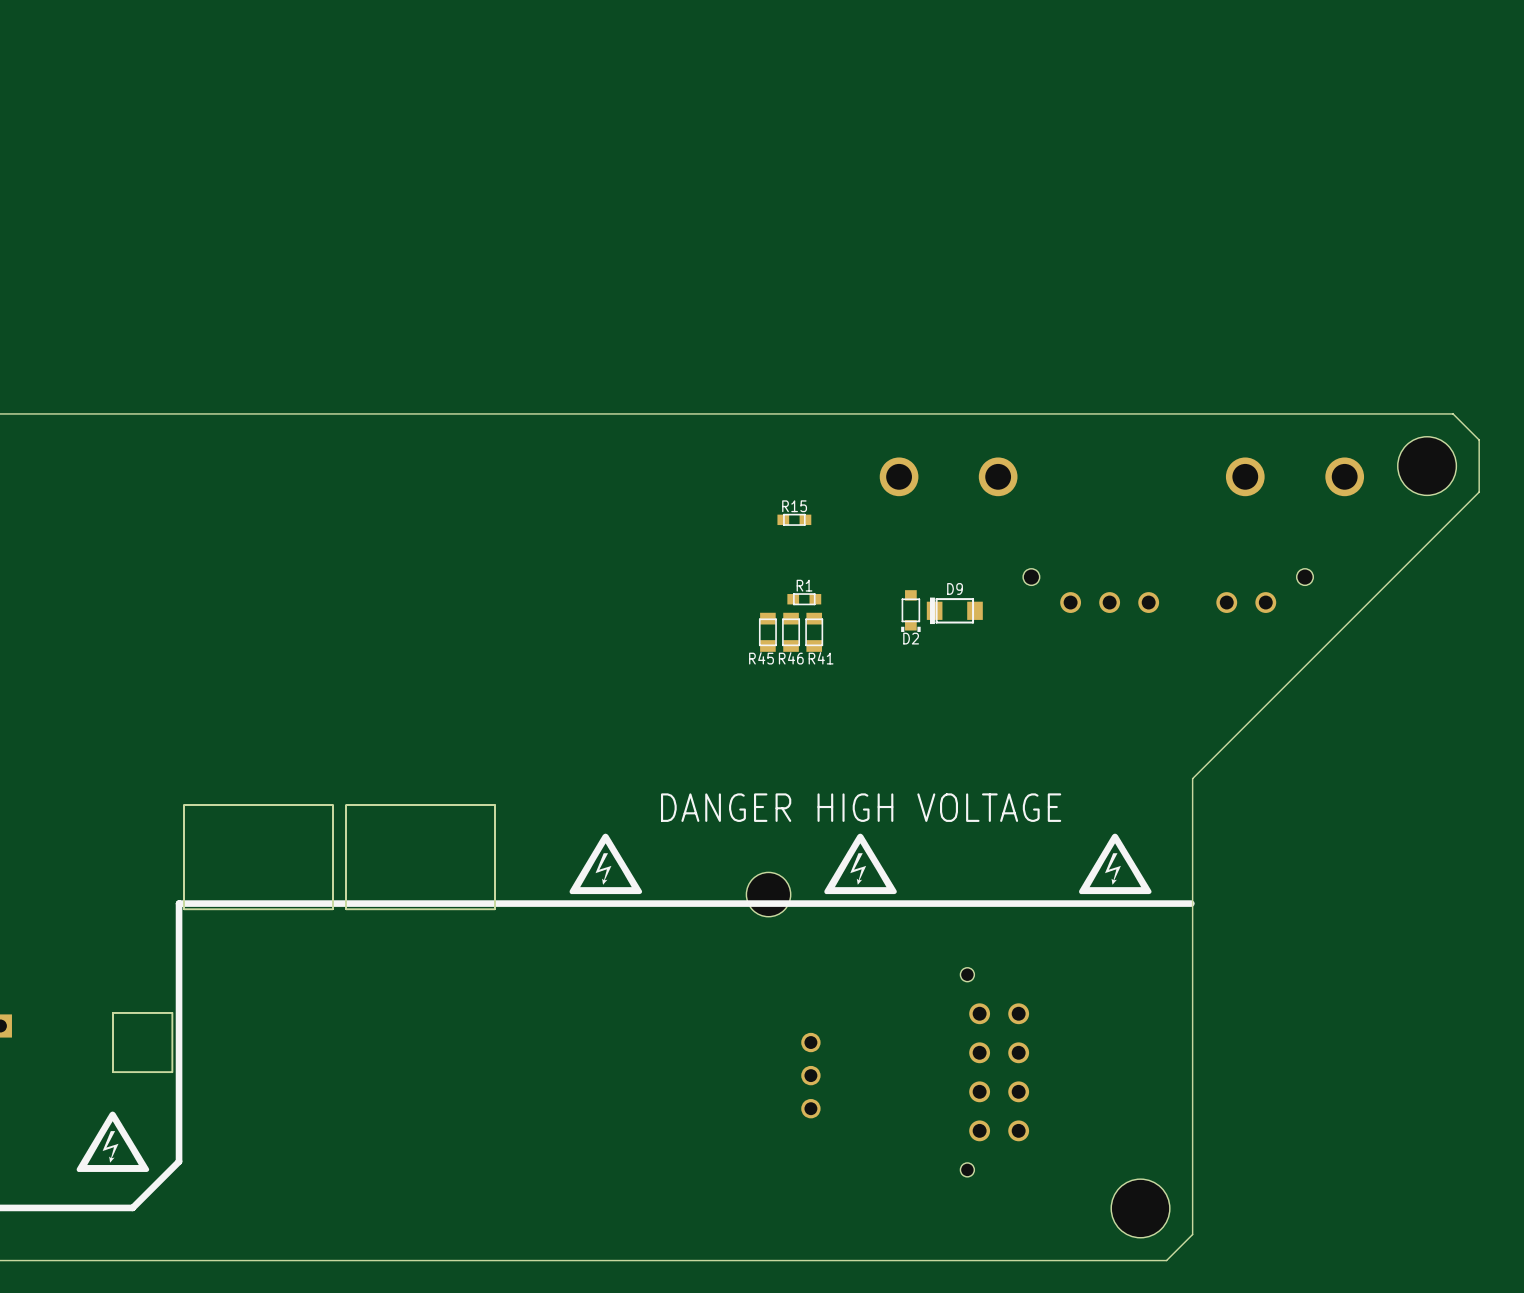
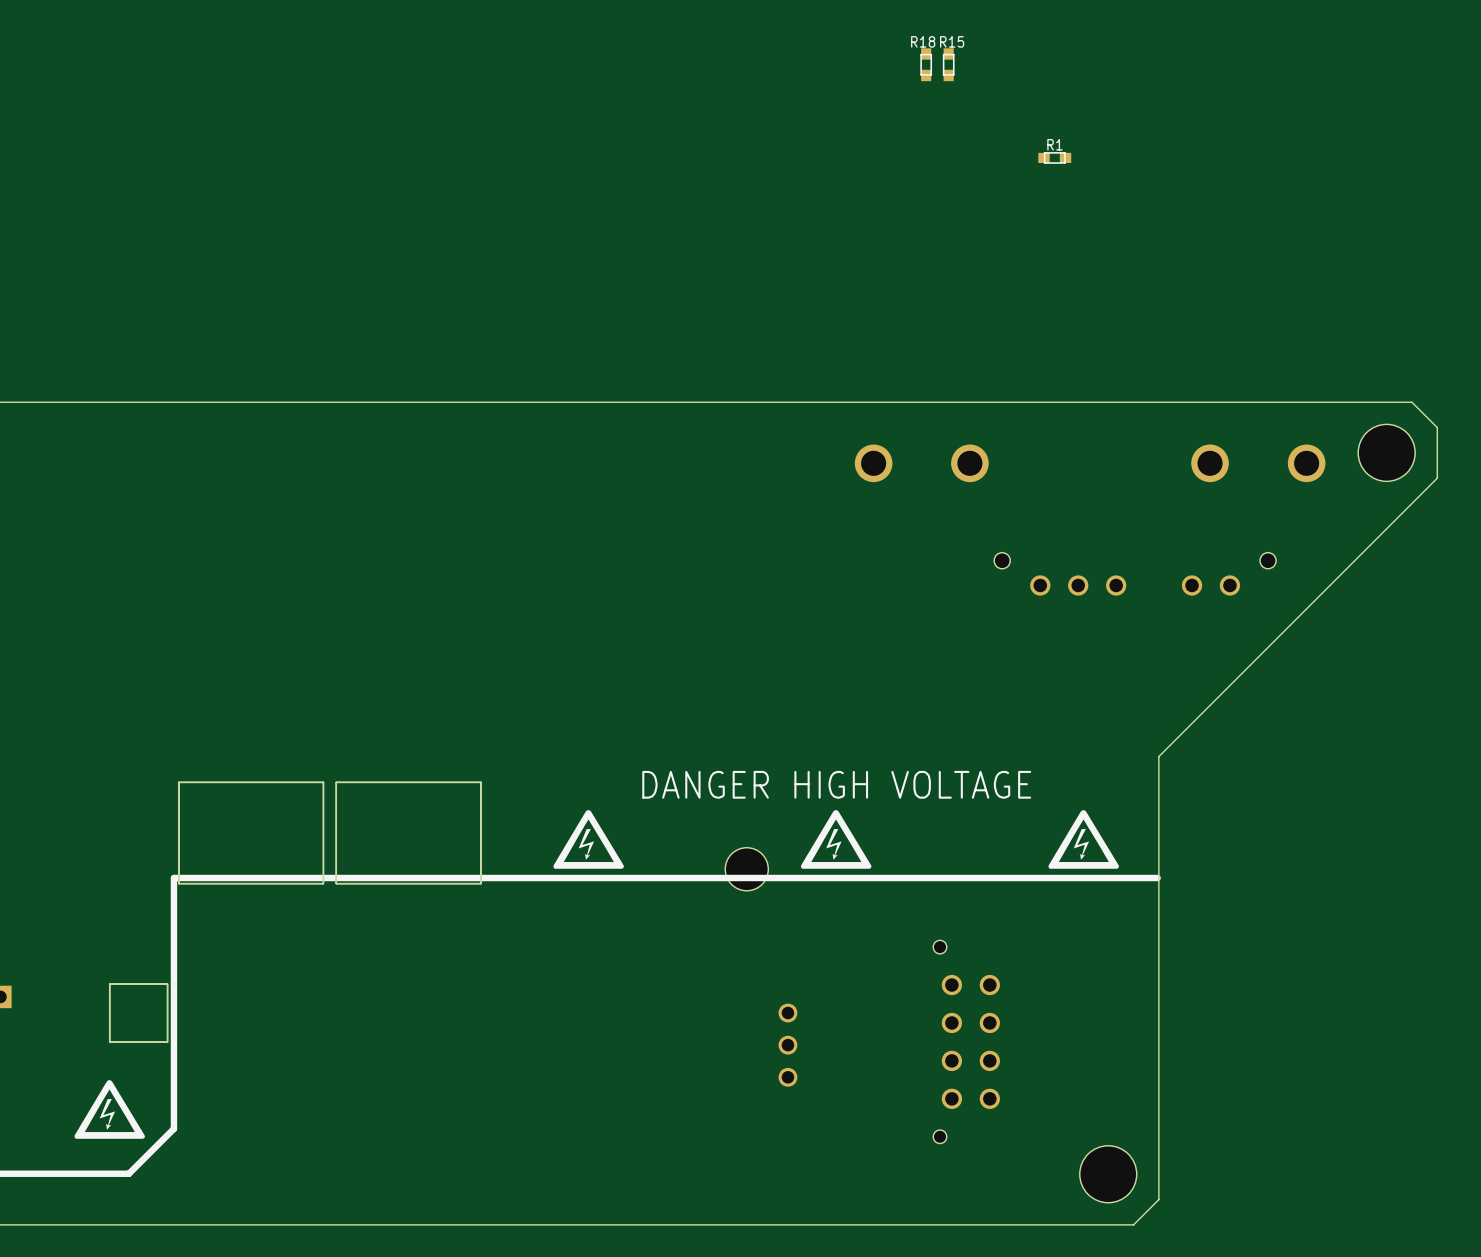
R18: none -> (926, 64)
R15 rotation: 0° (794, 519) -> 90° clockwise (948, 64)
R15 position: (794, 519) -> (948, 64)
R1 position: (804, 599) -> (1054, 157)
D9: (954, 610) -> none
D2: (910, 611) -> none
R45: (767, 632) -> none
R46: (791, 632) -> none
R41: (814, 632) -> none

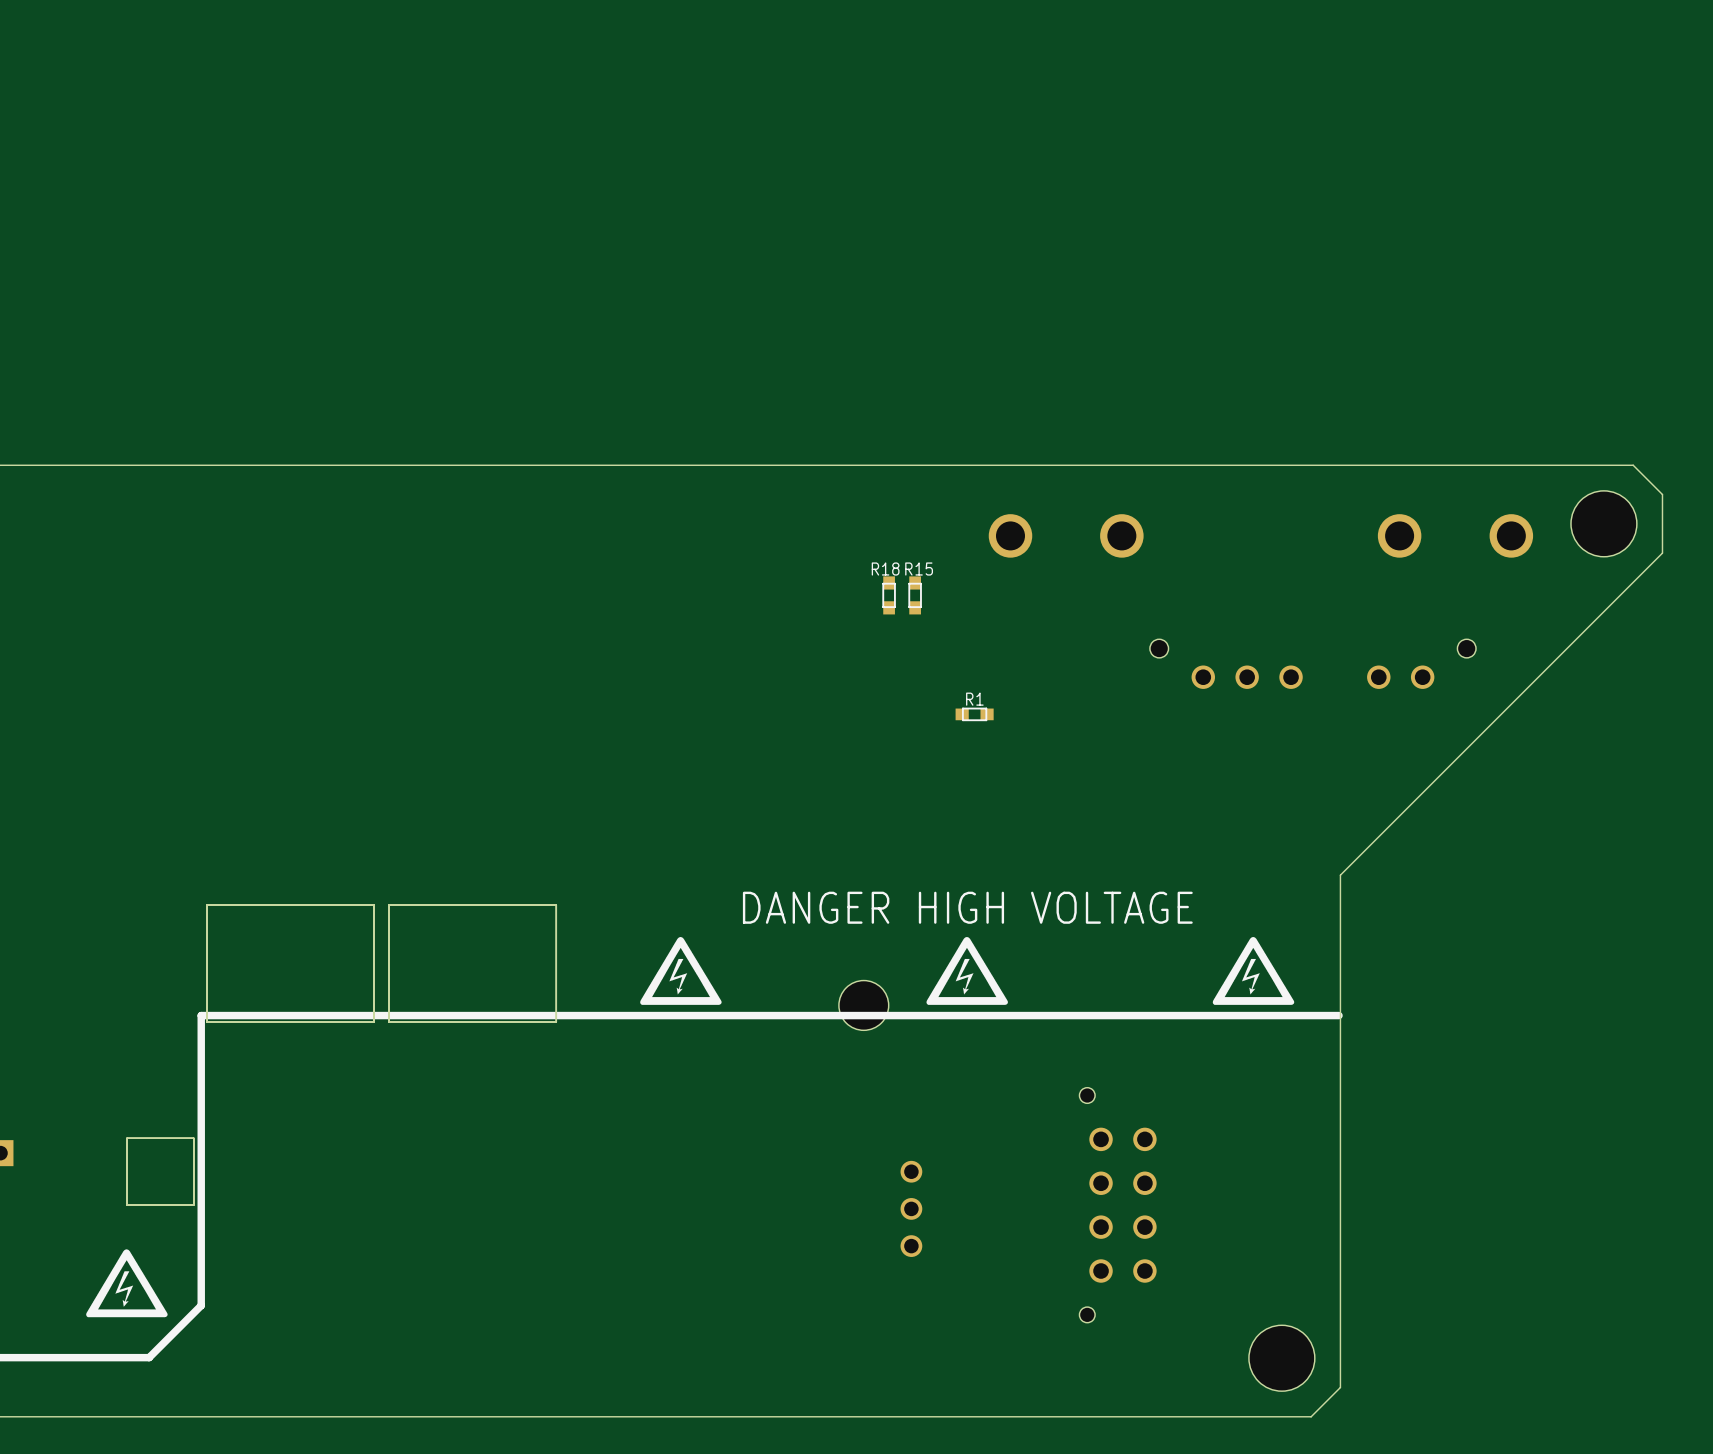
R18 position: (926, 64) -> (889, 595)
R15 position: (948, 64) -> (915, 595)
R1 position: (1054, 157) -> (974, 714)

